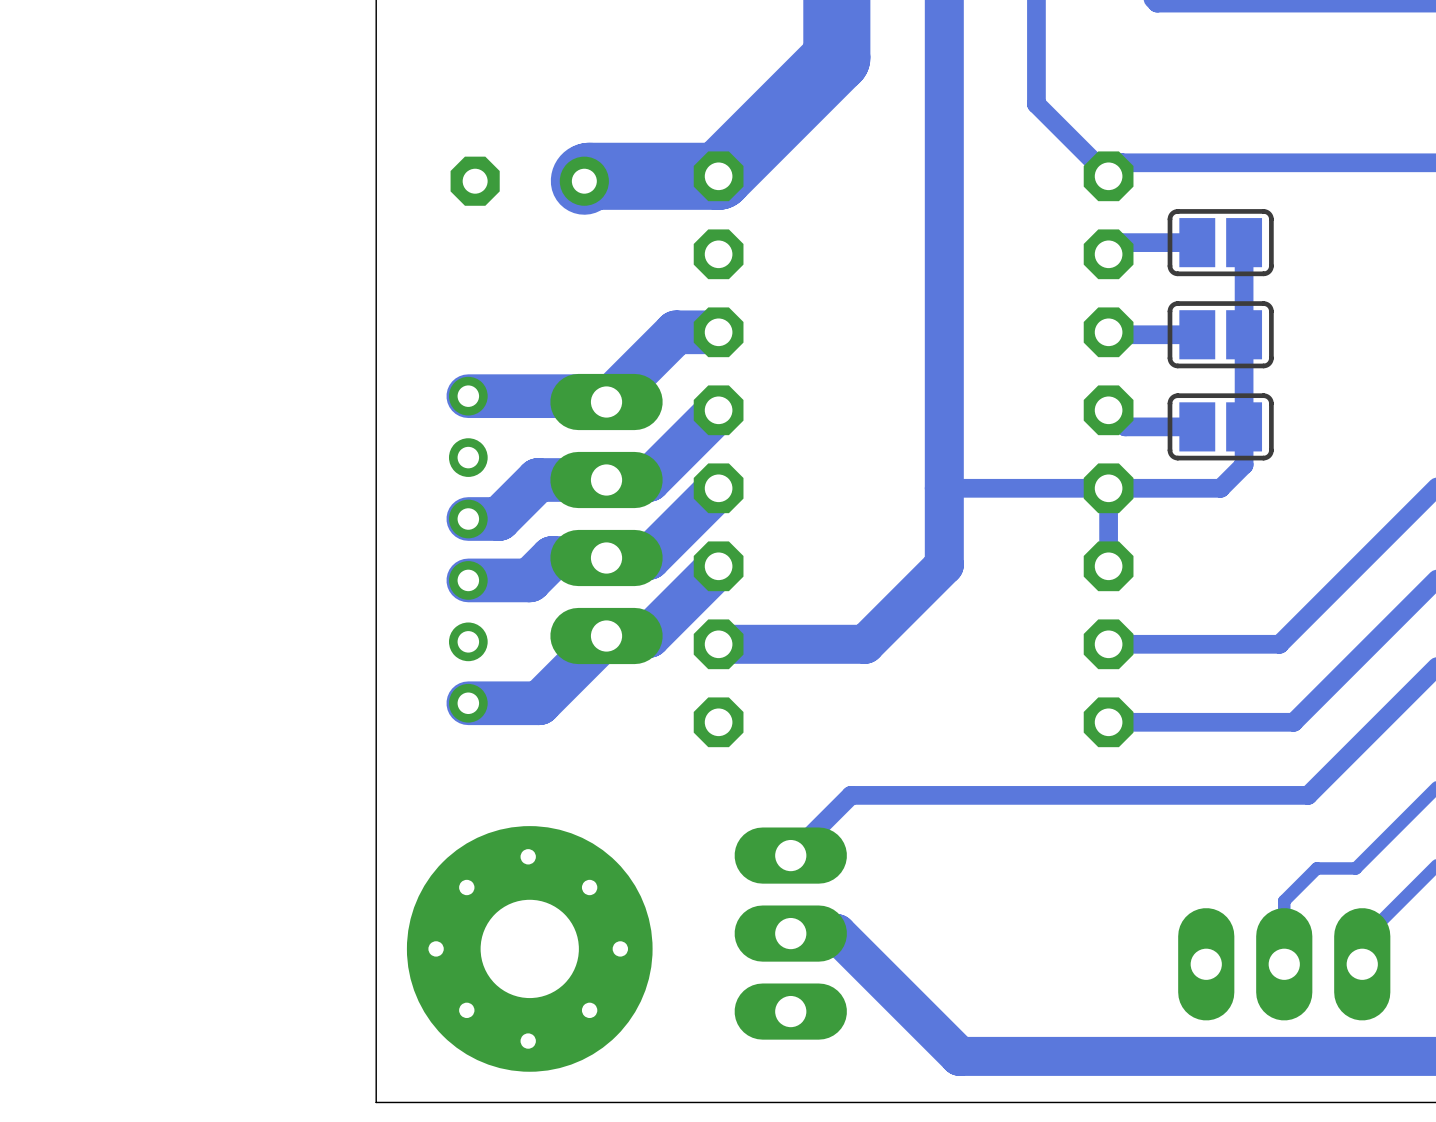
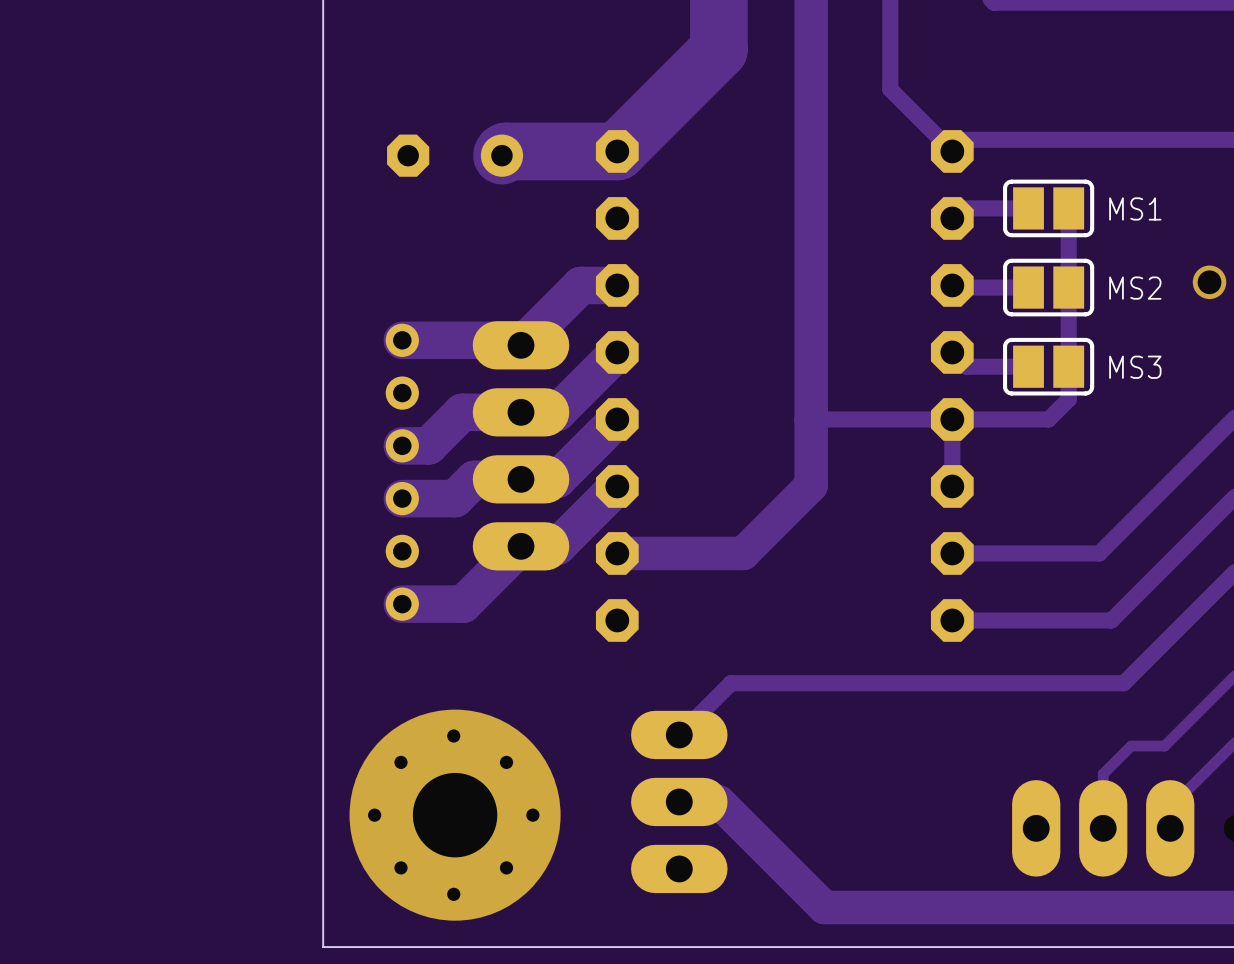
text: none -> MS1 (1135, 208)
via: none -> (1209, 282)
text: none -> MS2 (1135, 288)
text: none -> MS3 (1135, 367)

